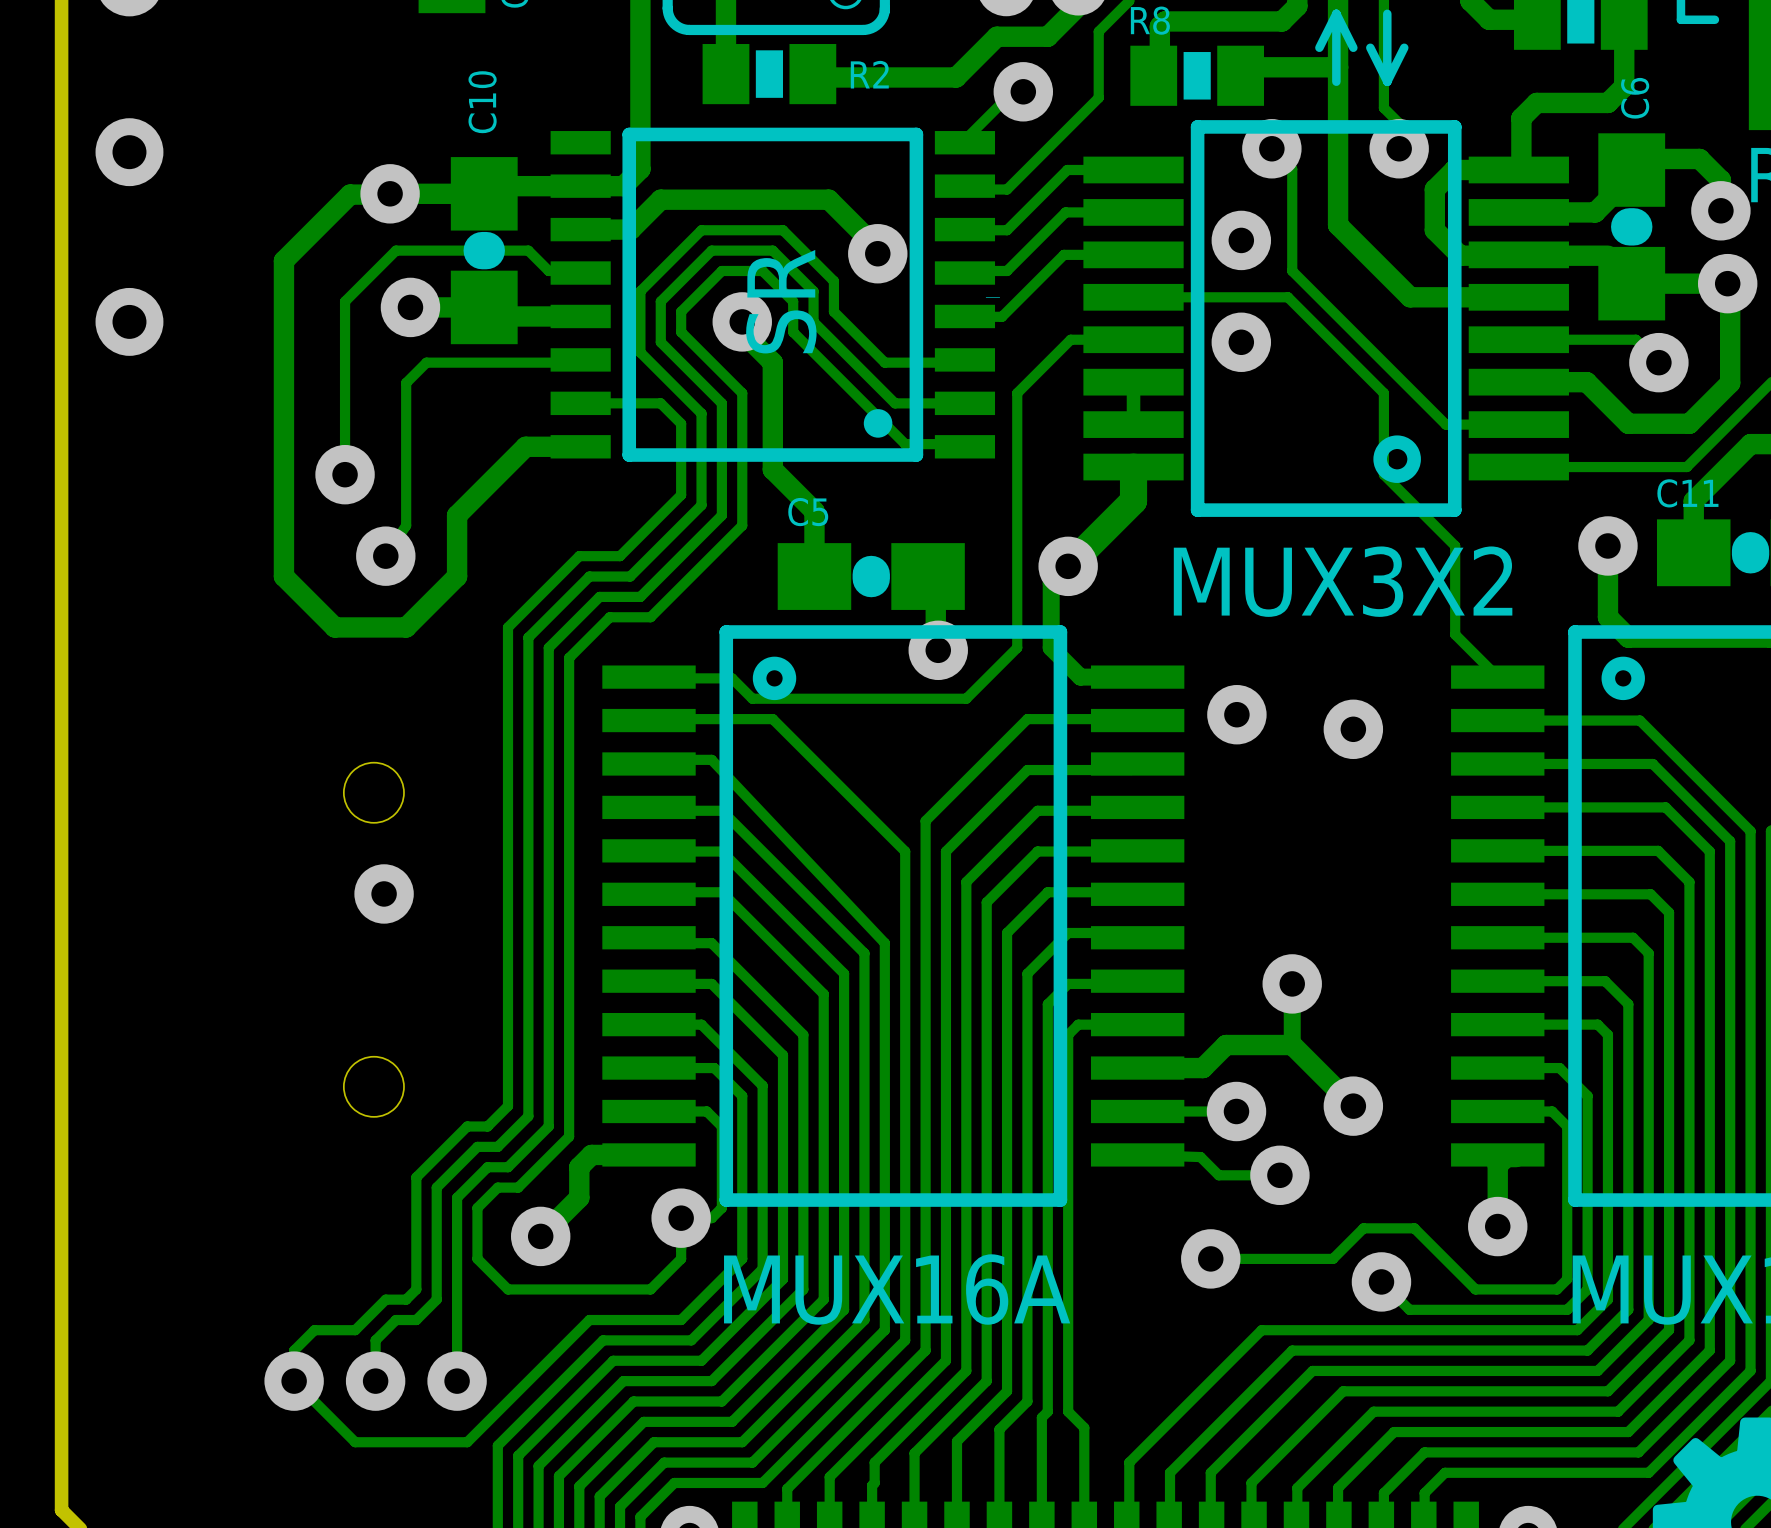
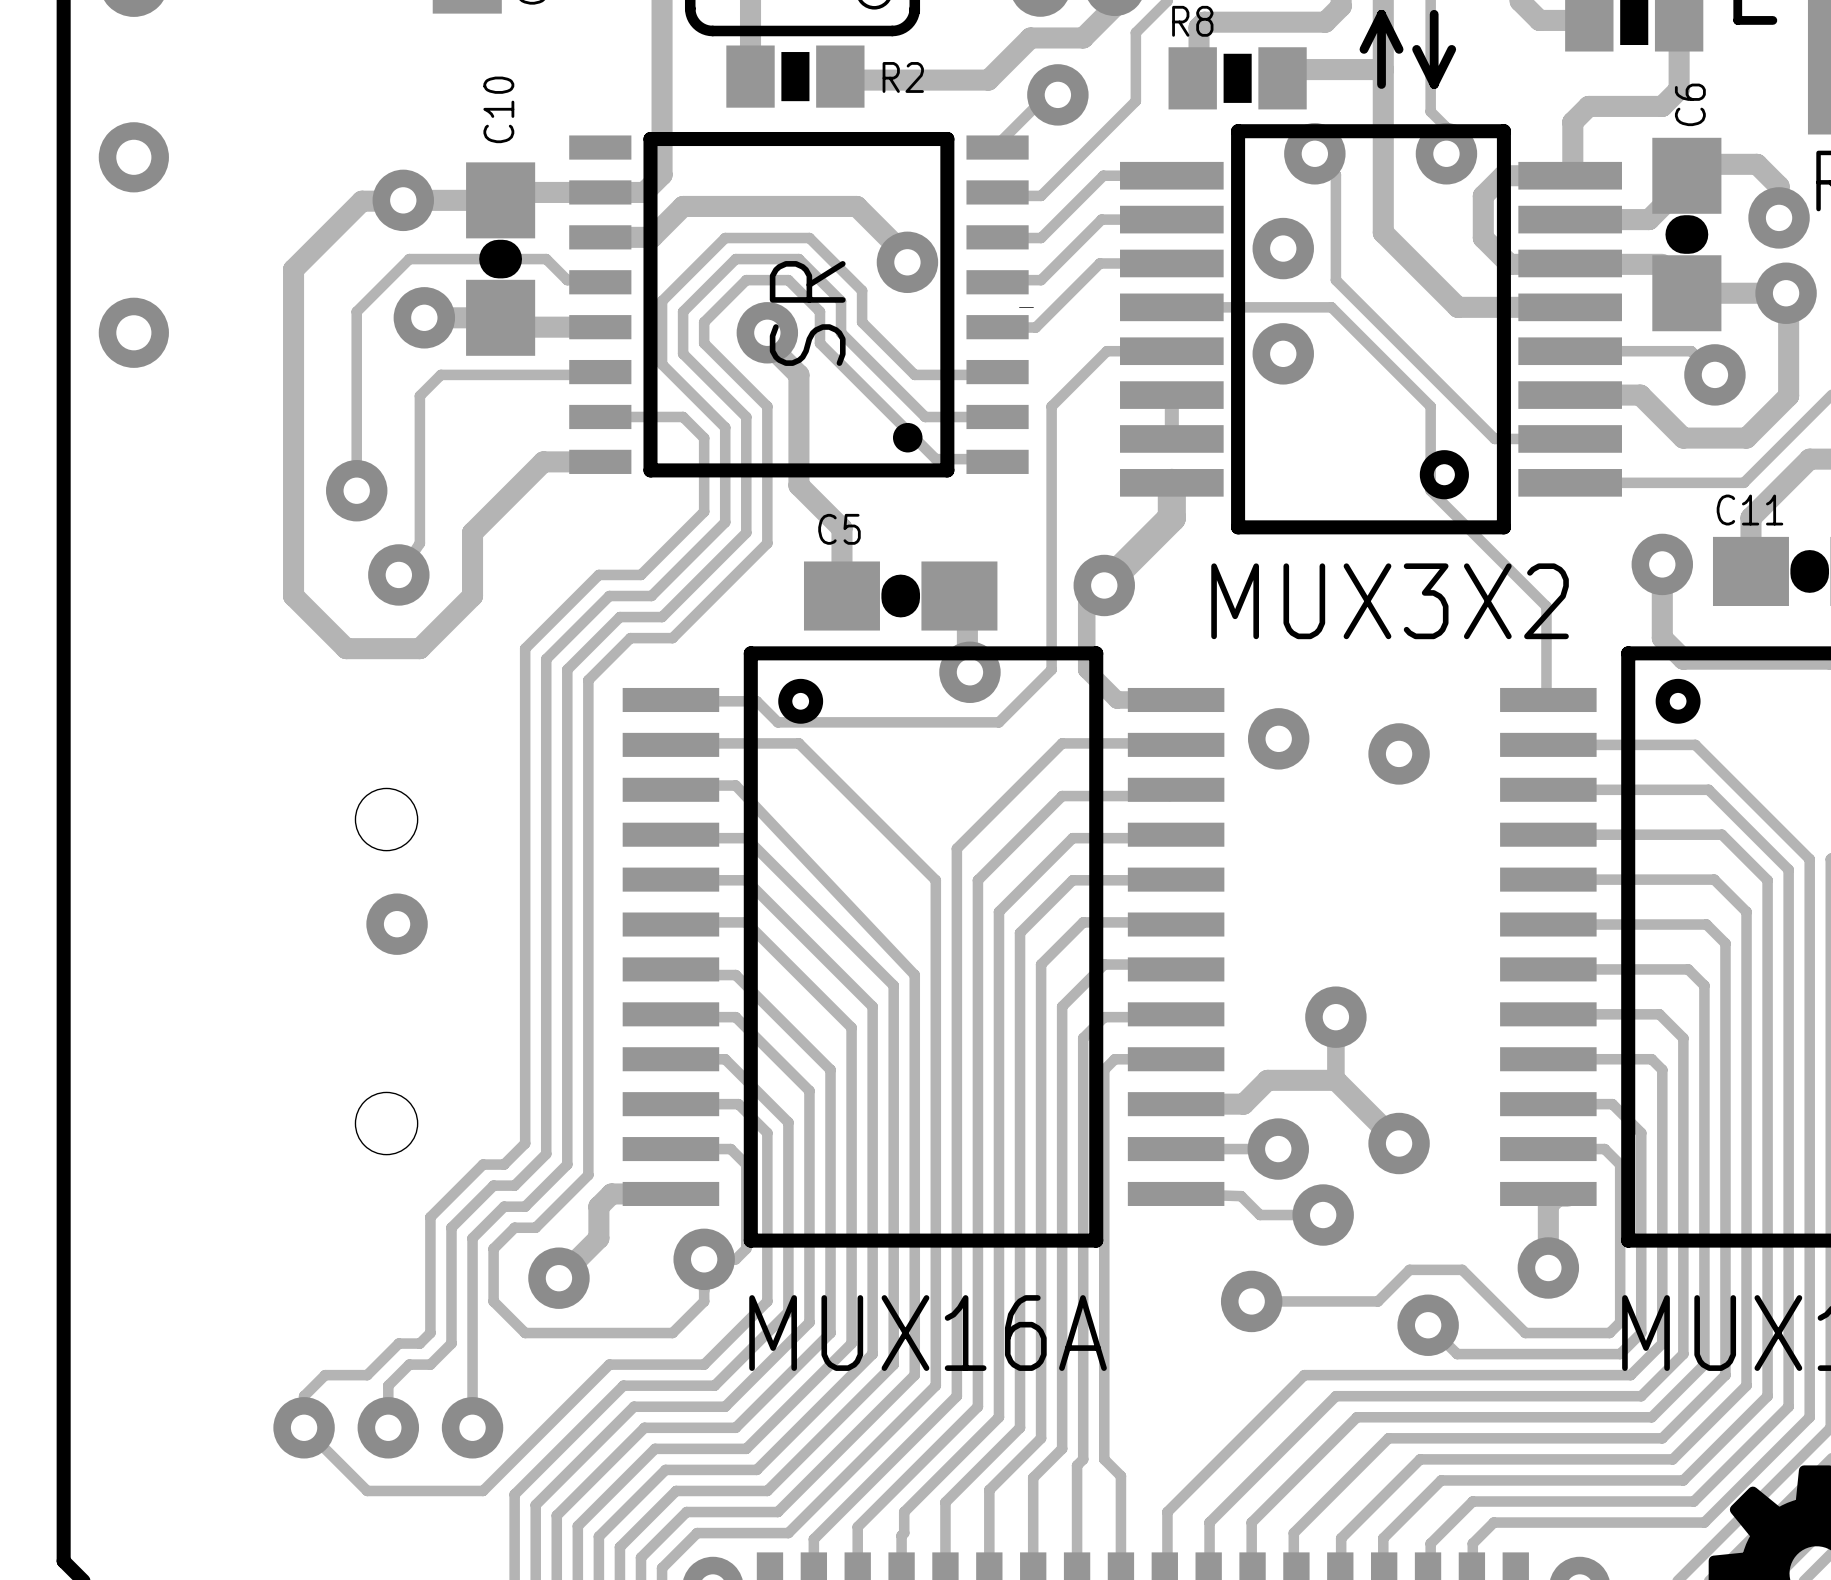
track: (1455, 545) (1455, 634) (1495, 675) -> (1504, 564) (1546, 606) (1546, 698)

